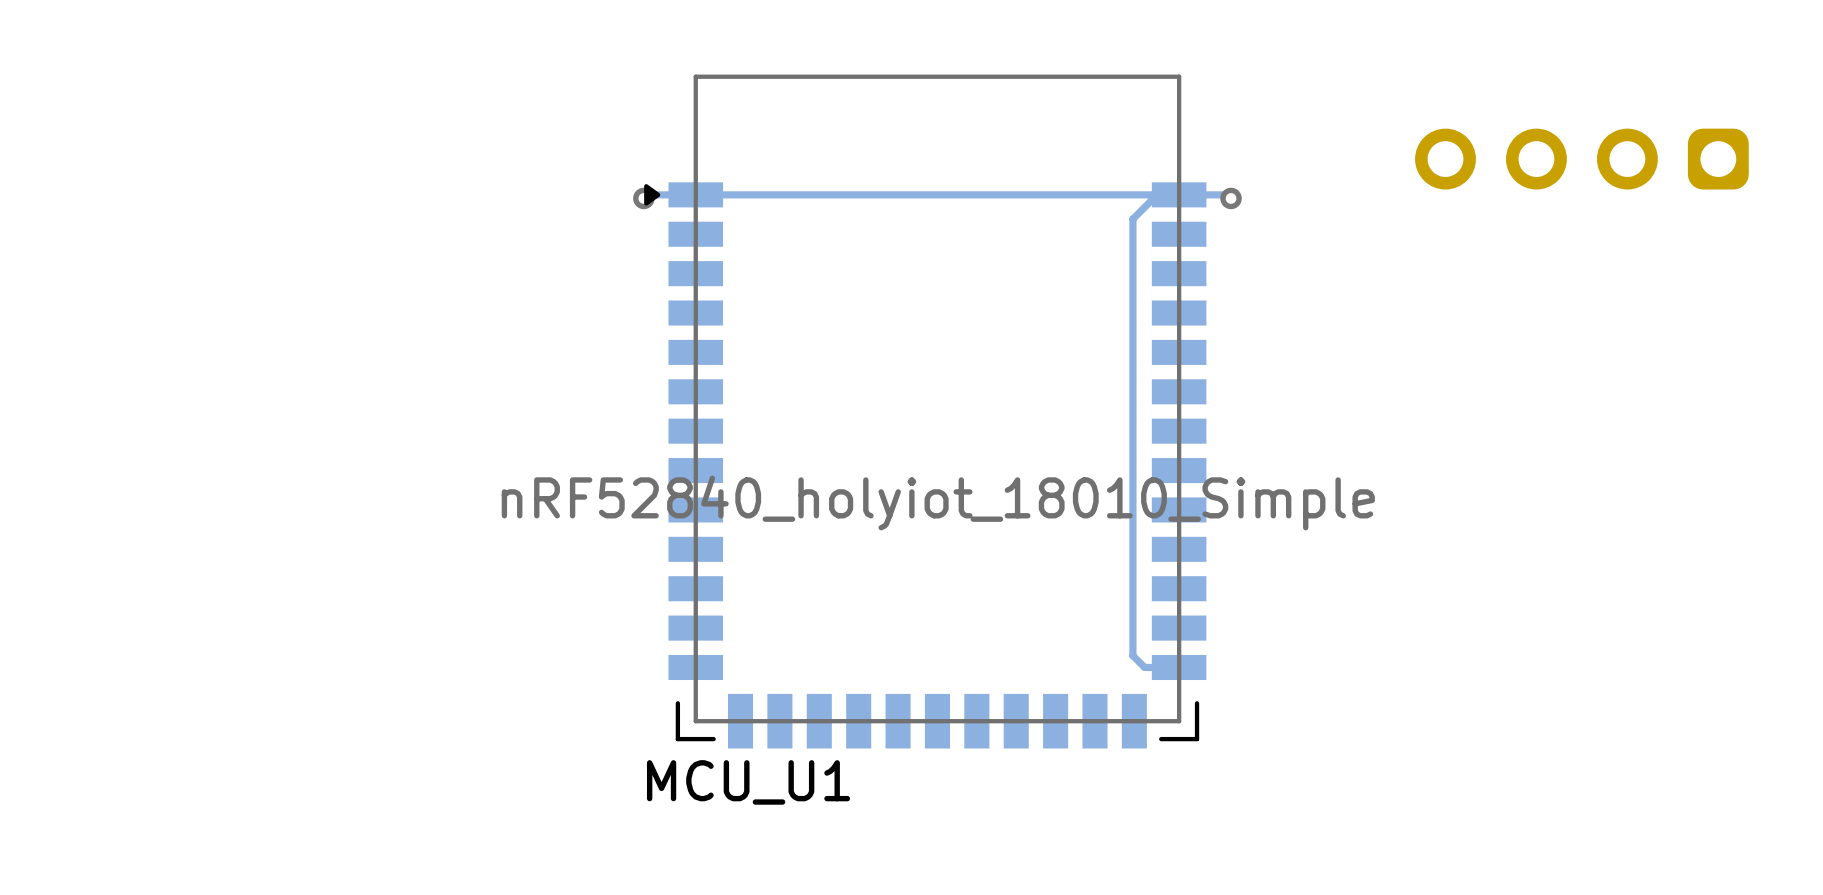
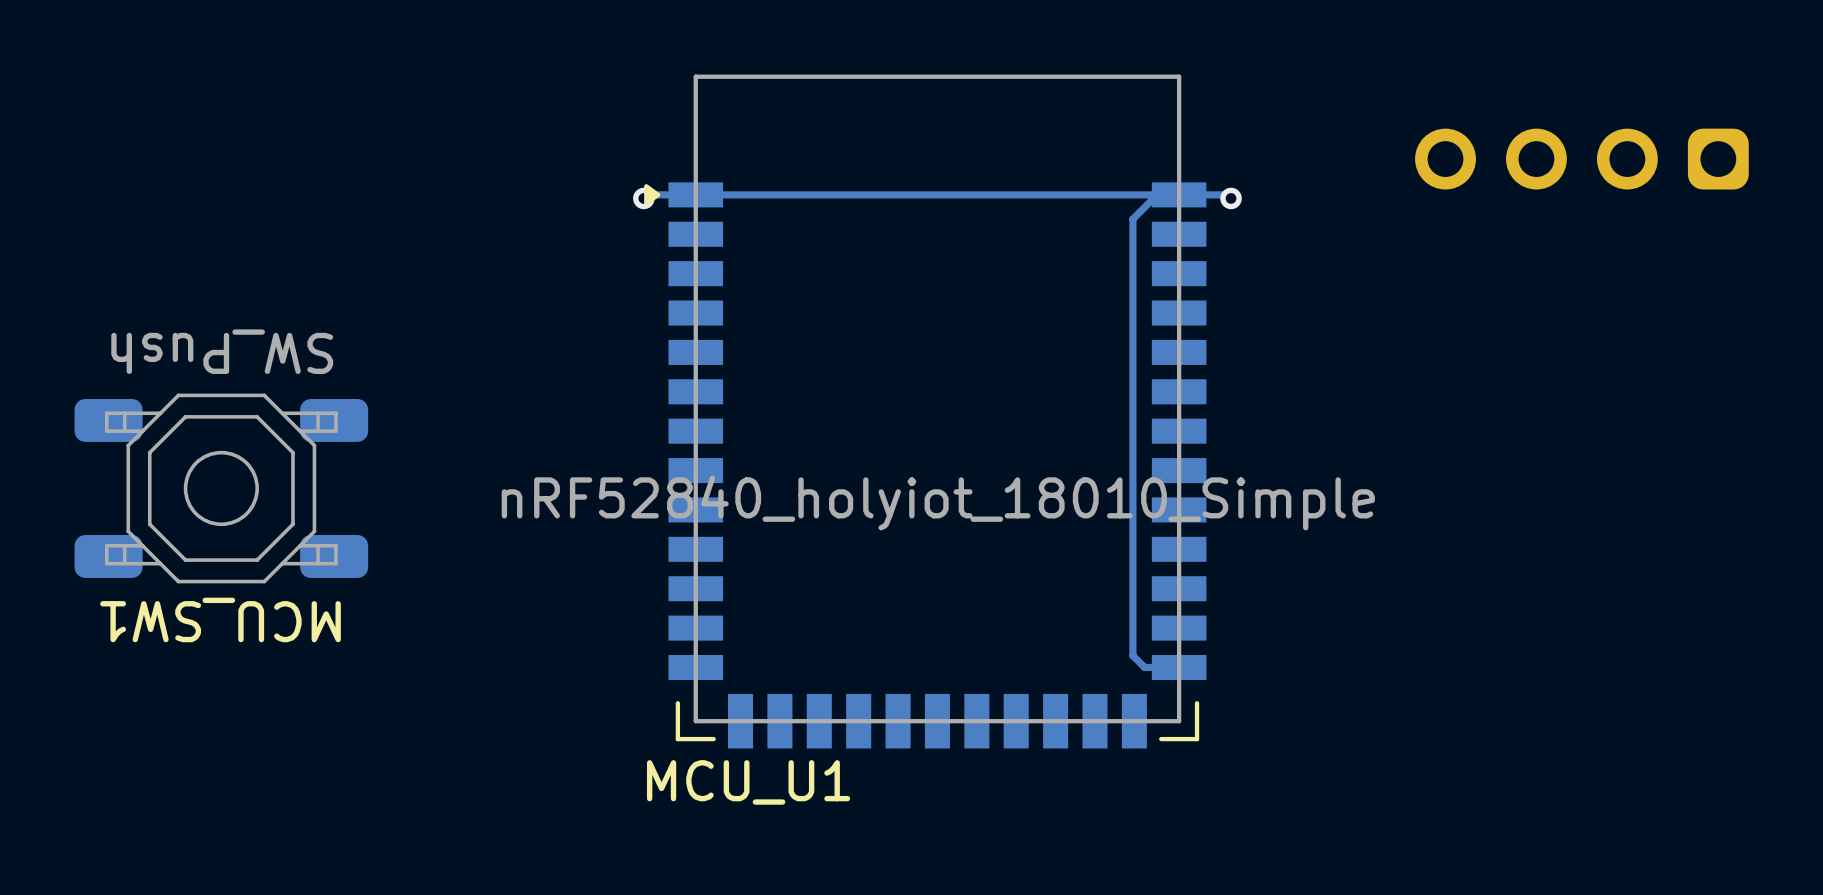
MCU_SW1: none -> SW_Push (221, 488)

